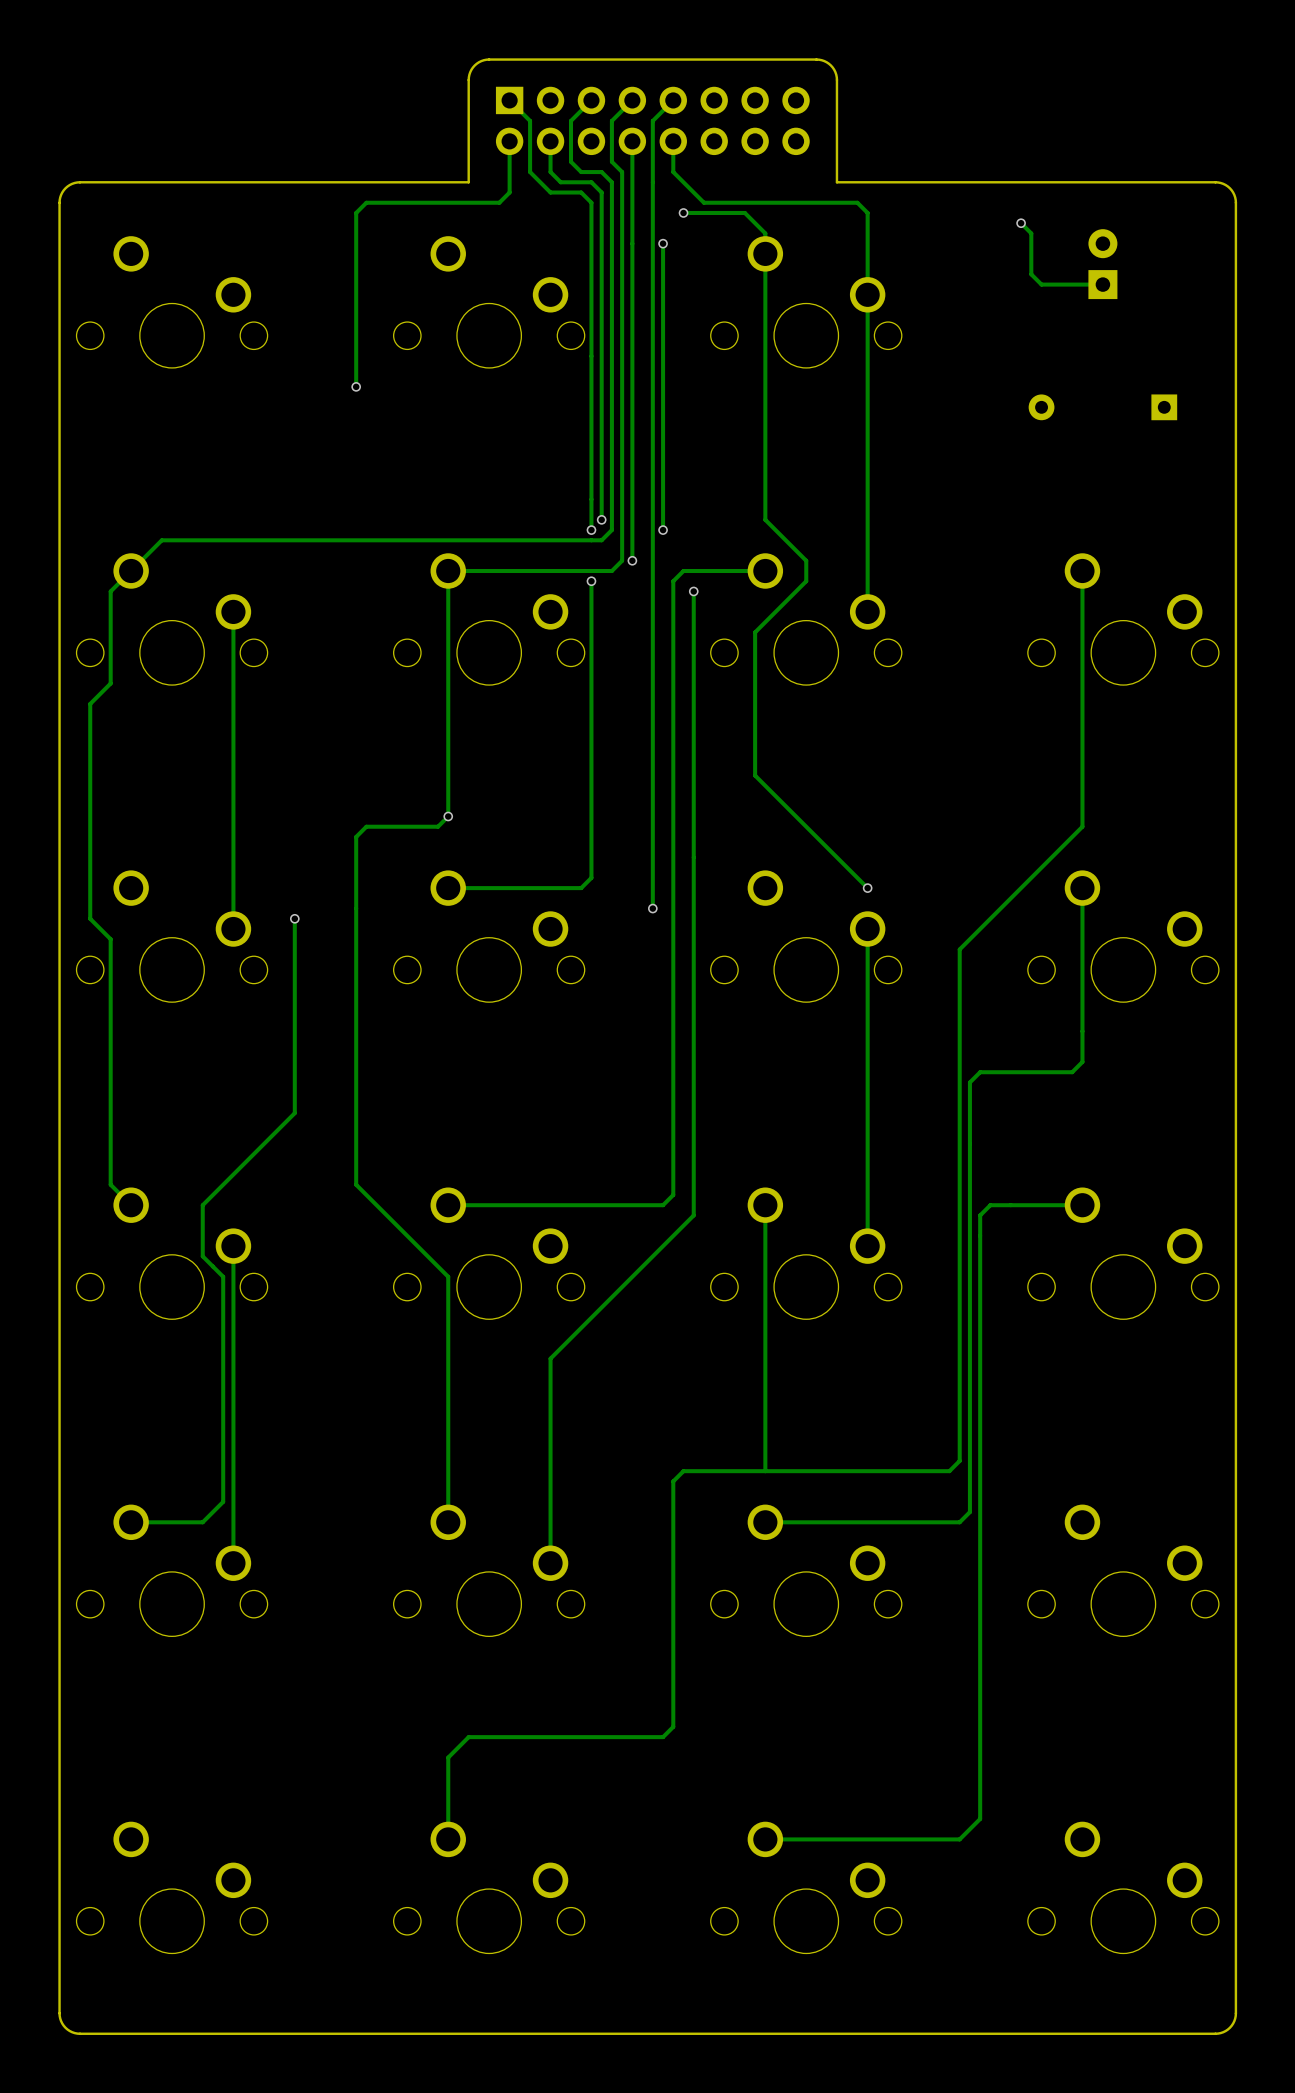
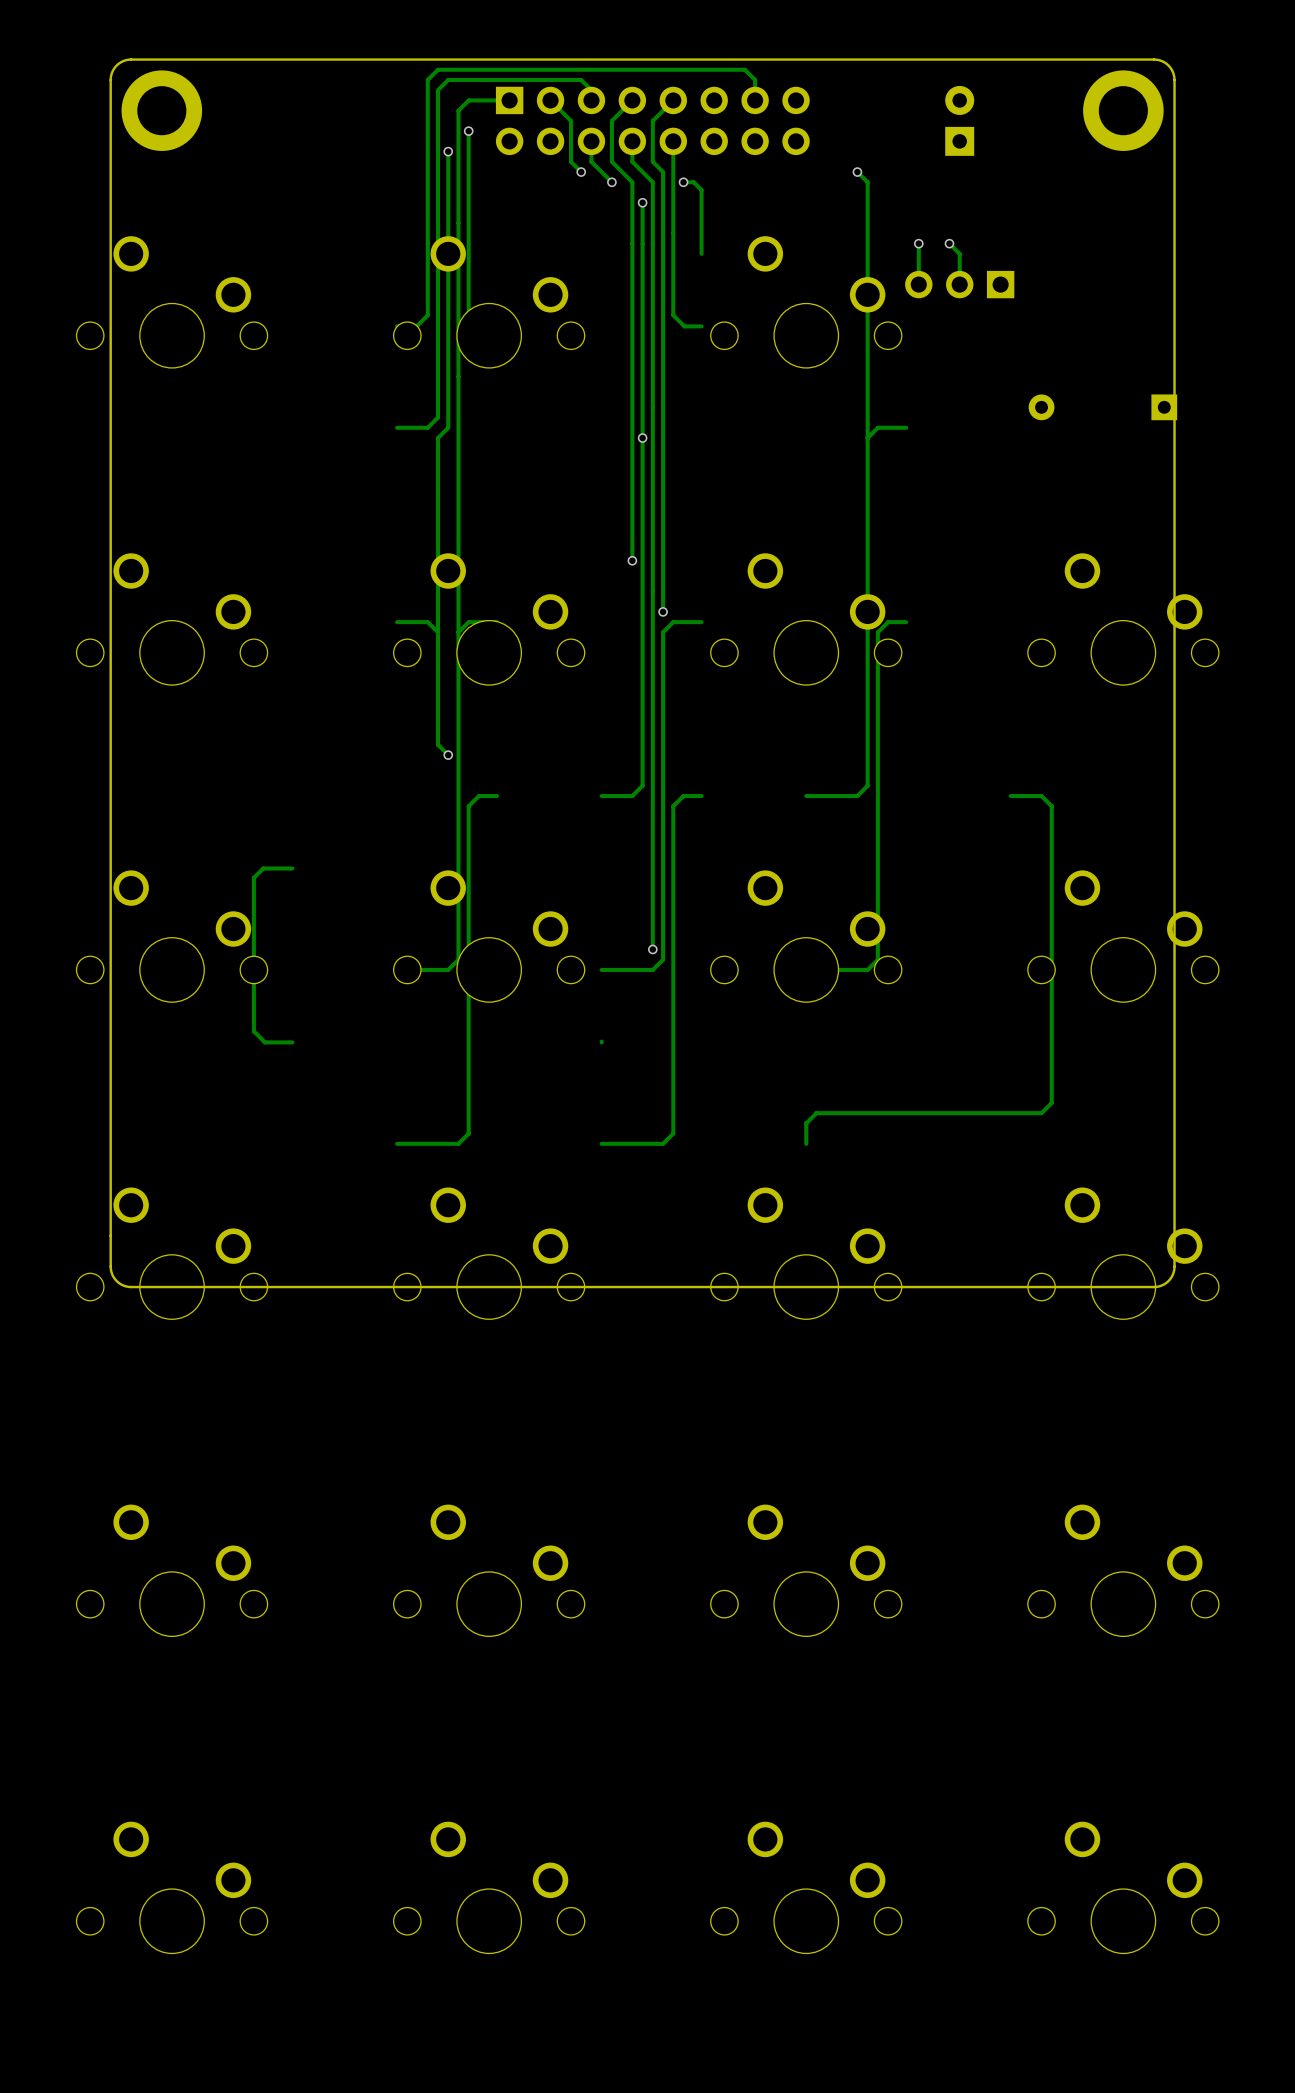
board edge: (489, 59) (481, 61) (474, 65) (468, 77) (468, 182) (79, 182) (67, 186) (60, 197) (59, 2013) (63, 2025) (74, 2033) (1215, 2033) (1225, 2031) (1234, 2021) (1235, 2013) (1235, 197) (1227, 186) (1215, 182) (836, 182) (836, 77) (830, 65) (824, 61) (816, 59) -> (1154, 59) (816, 59)
board edge: none -> (489, 59) (131, 59) (118, 63) (111, 74) (110, 1266) (112, 1274) (116, 1281) (123, 1285) (131, 1287)
board edge: none -> (1154, 59) (1161, 61) (1168, 65) (1172, 72) (1174, 79) (1174, 1266) (1170, 1279) (1161, 1285) (1154, 1287) (131, 1287)
track: (509, 100) (530, 120) (530, 172) (550, 192) (581, 192) (591, 202) (591, 530) -> (509, 100) (468, 100) (458, 110) (458, 959) (448, 969) (397, 969)
track: (591, 100) (571, 120) -> (550, 100) (571, 120)
track: none -> (591, 100) (591, 90) (581, 79) (448, 79) (438, 90) (438, 417) (427, 427) (397, 427)
track: none -> (755, 100) (755, 79) (744, 69) (438, 69) (427, 79) (427, 315) (416, 326) (397, 326)
part: none -> (161, 110)
part: none -> (1123, 110)
track: none -> (468, 131) (468, 315) (478, 325) (496, 326)
via: none -> (468, 131)
track: (509, 141) (509, 192) (499, 202) (366, 202) (356, 212) (356, 386) -> none
track: (550, 141) (550, 172) (560, 182) (591, 182) (601, 192) (601, 519) -> none
track: none -> (448, 151) (448, 427) (438, 438) (438, 744) (448, 755)
via: none -> (448, 151)
track: (632, 161) (632, 182) -> (622, 172) (632, 182)
track: (652, 161) (652, 182) -> (632, 161) (652, 182)
track: none -> (652, 161) (663, 172) (663, 243)
via: none -> (581, 172)
track: (601, 172) (581, 172) -> (601, 172) (591, 161) (591, 141)
track: (622, 172) (622, 560) (611, 571) (448, 571) (448, 816) (438, 826) (366, 826) (356, 836) (356, 1184) (448, 1276) (448, 1522) -> none
track: (673, 172) (703, 202) (857, 202) (867, 212) -> (857, 172) (867, 182) (867, 212)
track: none -> (673, 172) (673, 315) (684, 326) (701, 326)
via: none -> (857, 172)
track: (611, 182) (611, 530) (601, 540) (161, 540) (110, 591) (110, 683) (90, 703) (90, 918) (110, 939) (110, 1184) (131, 1205) -> none
via: none -> (611, 182)
track: none -> (683, 182) (693, 182) (701, 190) (701, 253)
via: none -> (683, 182)
track: none -> (642, 202) (642, 785) (632, 796) (601, 796)
via: none -> (642, 202)
track: (683, 212) (744, 212) (765, 233) (765, 519) (806, 560) (806, 581) (755, 632) (755, 775) (867, 888) -> none
via: (683, 212) -> none
track: (1021, 223) (1031, 233) (1031, 274) (1041, 284) (1102, 284) -> none
via: (1021, 223) -> none
via: (663, 243) -> none
track: none -> (918, 243) (918, 284)
via: none -> (918, 243)
track: none -> (949, 243) (959, 253) (959, 284)
via: none -> (949, 243)
part position: (1102, 264) -> (959, 120)
part: none -> (959, 284)
via: (356, 386) -> none
track: none -> (906, 427) (877, 427) (867, 438)
via: none -> (642, 438)
via: (601, 519) -> none
via: (591, 530) -> none
track: none -> (663, 530) (663, 611)
via: (663, 530) -> none
track: (765, 571) (683, 571) (673, 581) (673, 806) -> (701, 796) (683, 796) (673, 806)
track: (1082, 571) (1082, 826) (959, 949) (959, 1460) (949, 1471) (683, 1471) (673, 1481) (673, 1726) (663, 1737) (468, 1737) (448, 1757) (448, 1839) -> none
track: (591, 581) (591, 877) (581, 888) (448, 888) -> none
via: (591, 581) -> none
track: (693, 591) (693, 1215) (550, 1358) (550, 1563) -> none
via position: (693, 591) -> (663, 611)
track: (233, 611) (233, 929) -> none
track: none -> (867, 611) (867, 785) (857, 796) (806, 796)
track: none -> (397, 622) (427, 622) (438, 632)
track: none -> (496, 622) (468, 622) (458, 632)
track: none -> (701, 622) (673, 622) (663, 632) (663, 959) (652, 969) (601, 969)
track: none -> (906, 622) (888, 622) (877, 632) (877, 959) (867, 969) (806, 969)
track: none -> (496, 796) (478, 796) (468, 806) (468, 1133) (458, 1143) (397, 1143)
track: none -> (1010, 796) (1041, 796) (1051, 806) (1051, 1102) (1041, 1113) (816, 1113) (806, 1123) (806, 1143)
via position: (448, 816) -> (448, 755)
track: none -> (292, 868) (263, 868) (253, 877) (253, 1031) (265, 1042) (292, 1042)
via: (867, 888) -> none
track: (1082, 888) (1082, 1062) (1072, 1072) (980, 1072) (969, 1082) (969, 1512) (959, 1522) (765, 1522) -> none
track: none -> (652, 908) (652, 949)
via position: (652, 908) -> (652, 949)
track: (294, 918) (294, 1113) (202, 1205) (202, 1256) (223, 1276) (223, 1501) (202, 1522) (131, 1522) -> none
via: (294, 918) -> none
track: (867, 929) (867, 1246) -> none
track: none -> (601, 1041) (601, 1042)
track: (673, 1133) (673, 1194) (663, 1205) (448, 1205) -> (673, 1133) (663, 1143) (601, 1143)
track: (765, 1205) (765, 1471) -> none
track: (1082, 1205) (990, 1205) (980, 1215) (980, 1818) (959, 1839) (765, 1839) -> none
track: (233, 1246) (233, 1563) -> none

